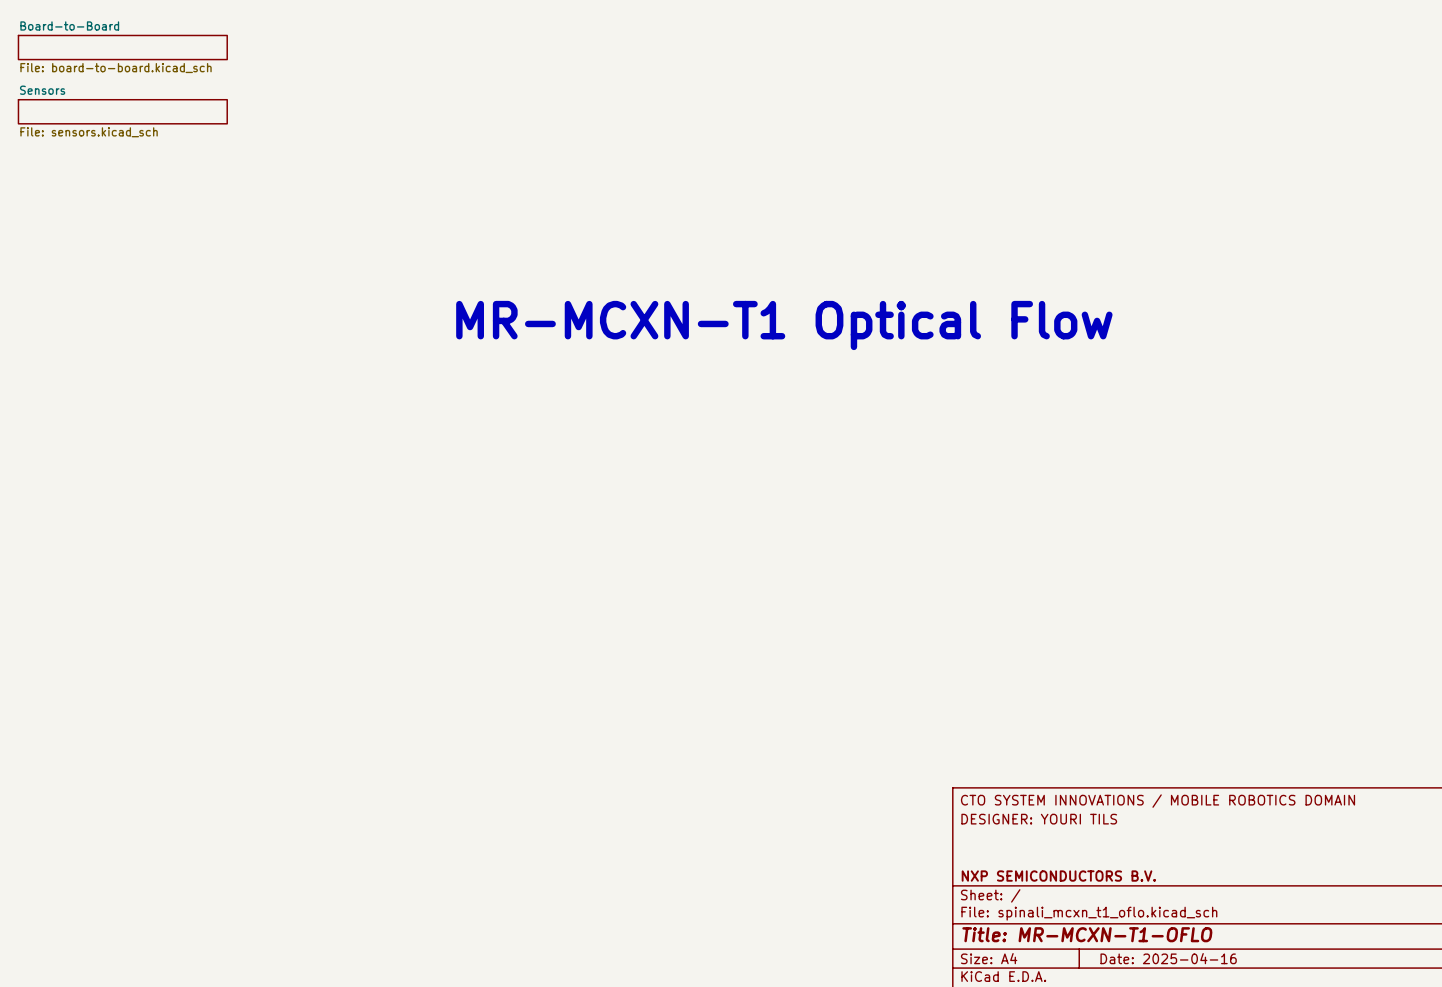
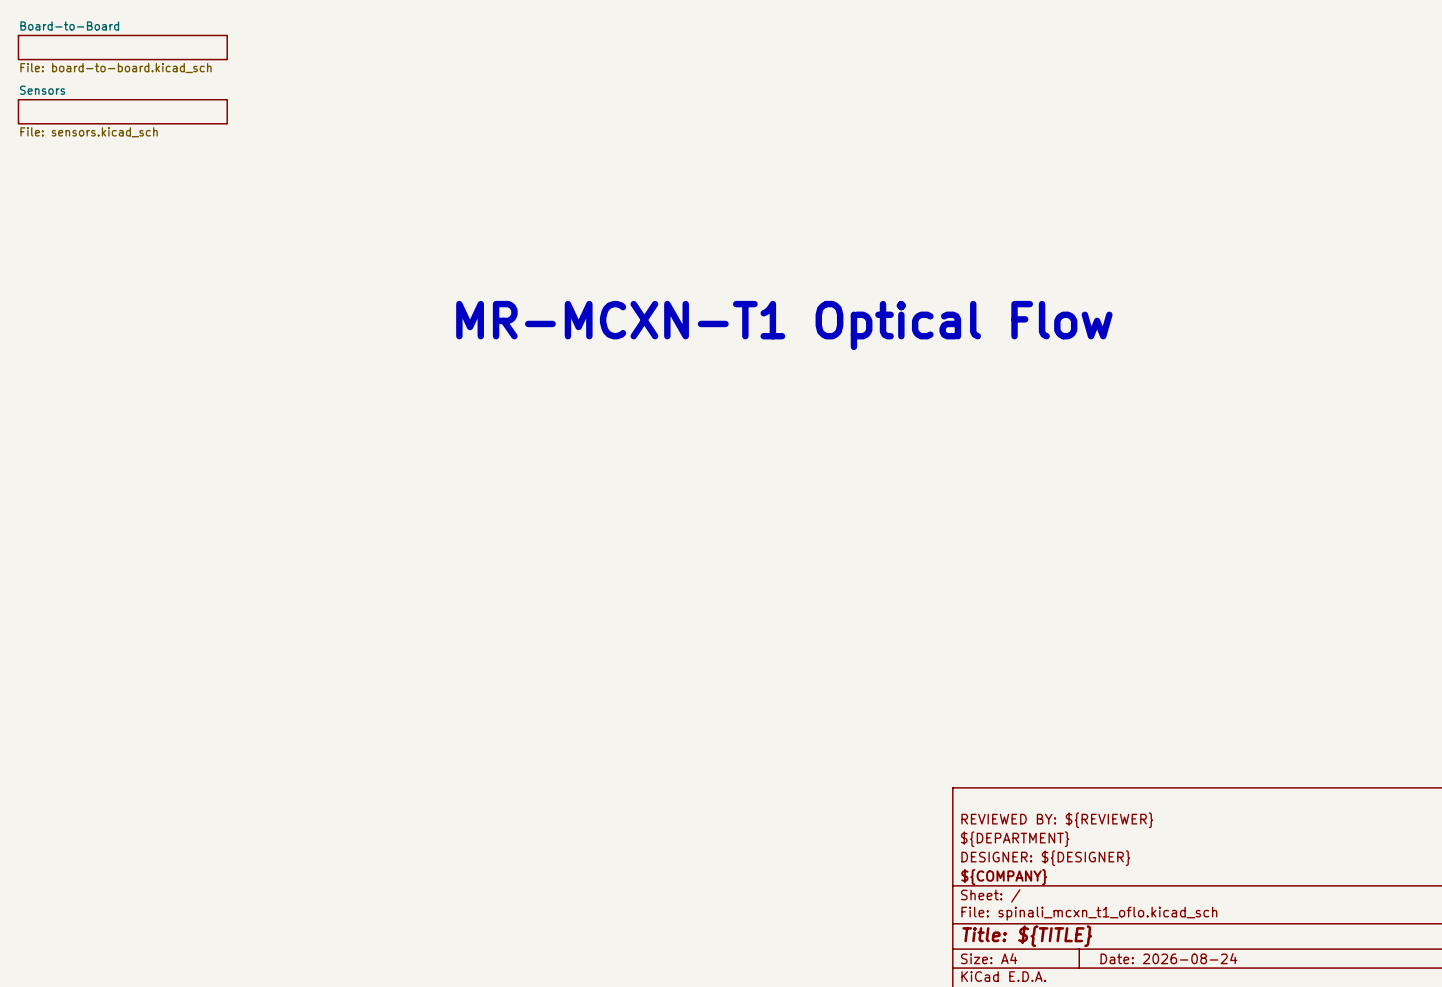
title block: CTO SYSTEM INNOVATIONS / MOBILE ROBOTICS DOMAIN (1158, 801) -> none
title block: DESIGNER: YOURI TILS (1039, 819) -> REVIEWED BY: ${REVIEWER} (1057, 820)
title block: none -> ${DEPARTMENT} (1015, 839)
title block: none -> DESIGNER: ${DESIGNER} (1045, 858)
title block: NXP SEMICONDUCTORS B.V. (1058, 876) -> ${COMPANY} (1004, 877)
title block: Title: MR-MCXN-T1-OFLO (1087, 934) -> Title: ${TITLE} (1027, 936)
title block: Date: 2025-04-16 (1168, 958) -> Date: 2026-08-24 (1168, 958)

